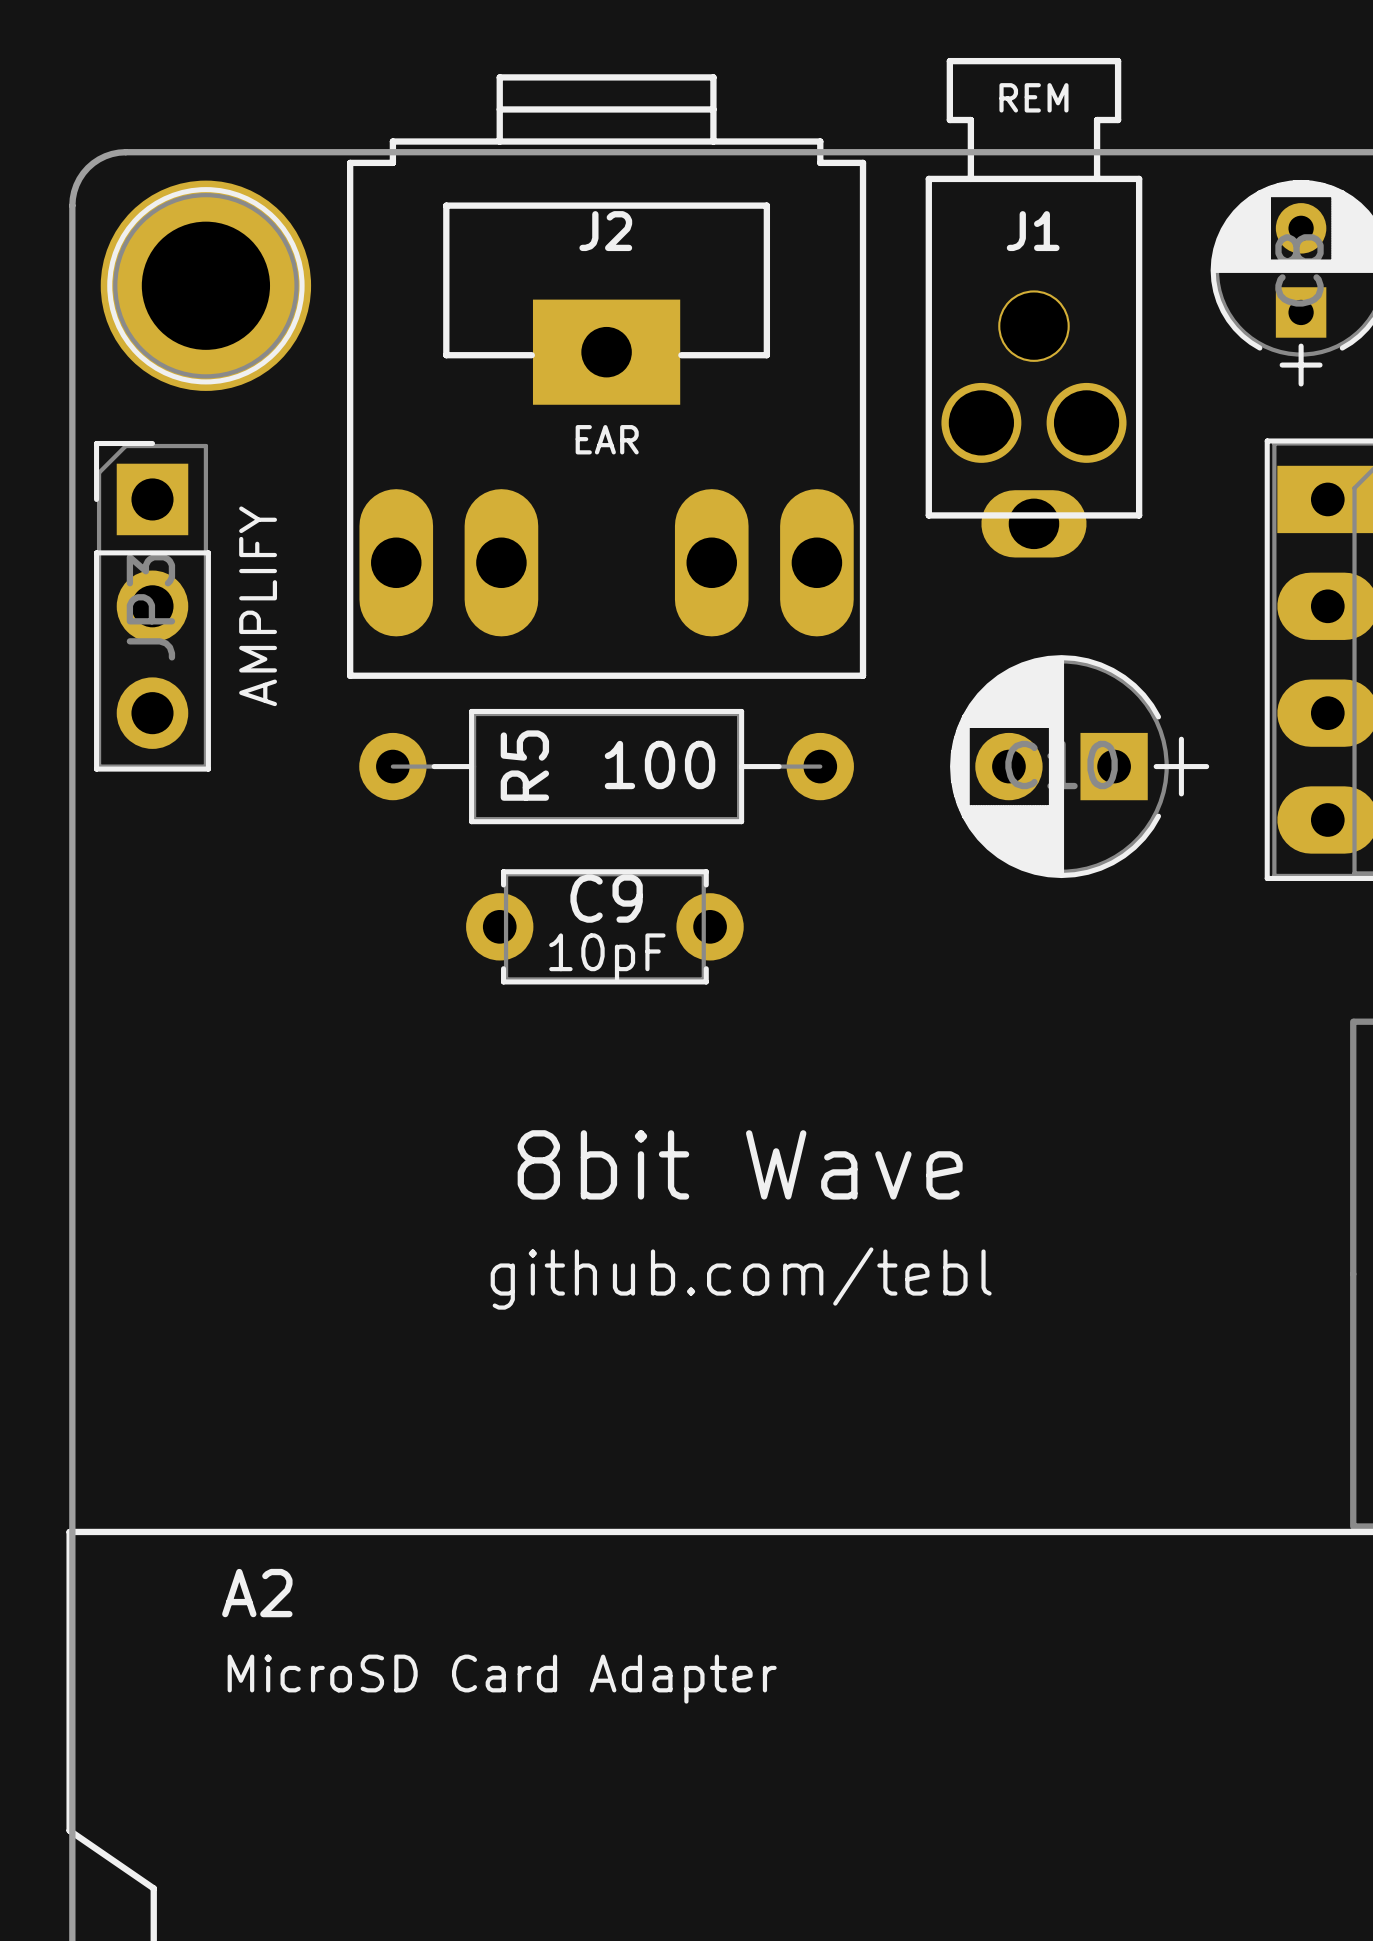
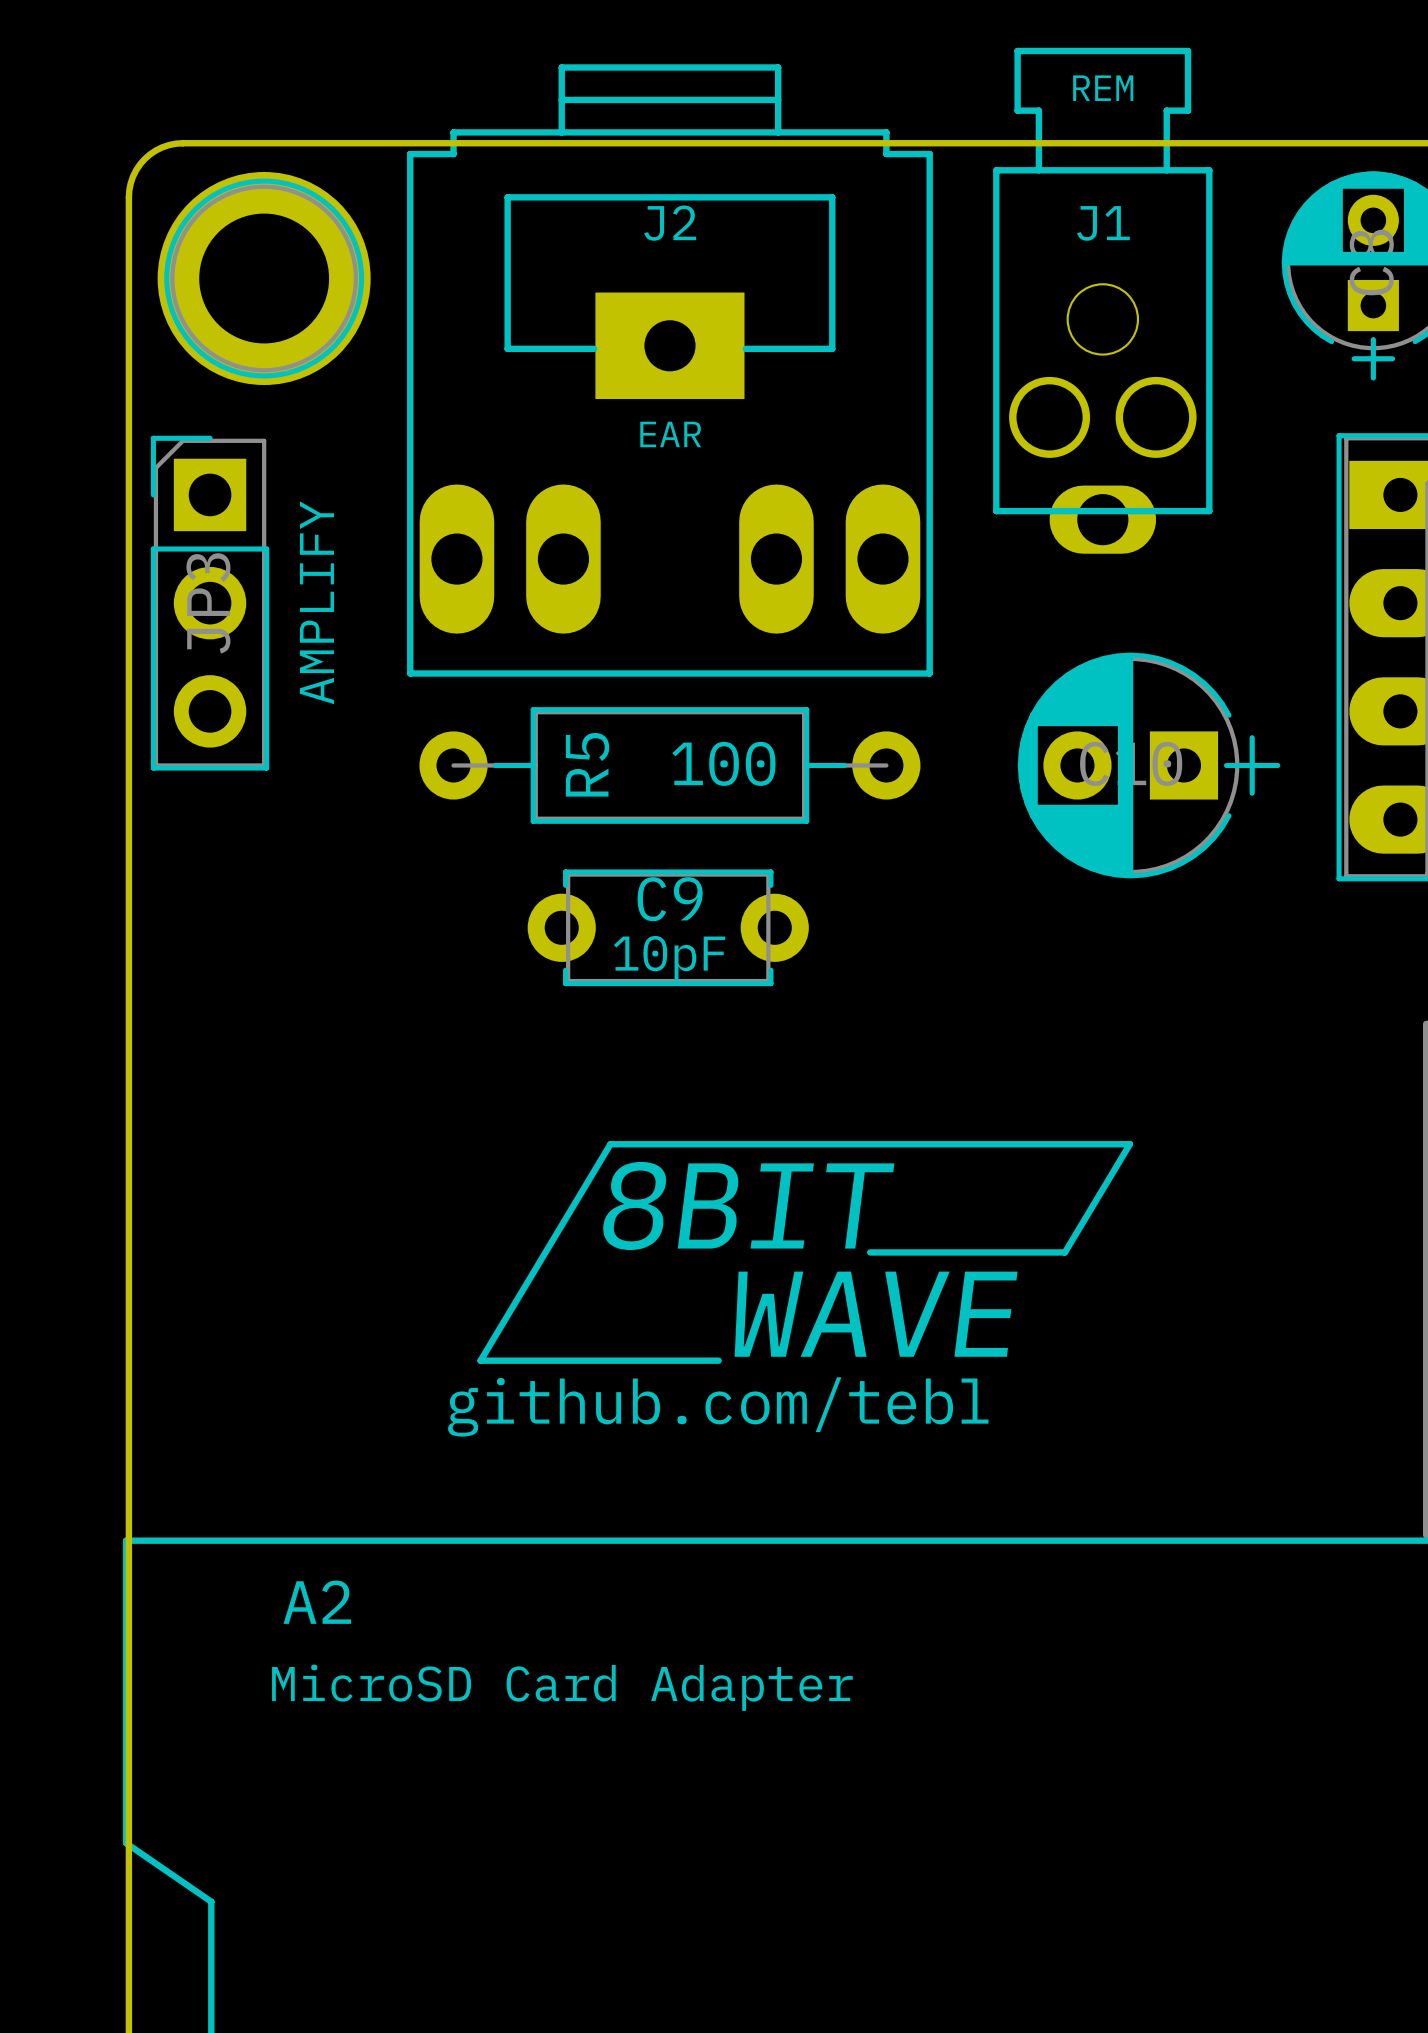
drawing: none -> [477, 1141, 1134, 1364]
text: 8bit Wave (740, 1164) -> none
text position: github.com/tebl (741, 1278) -> github.com/tebl (718, 1406)

